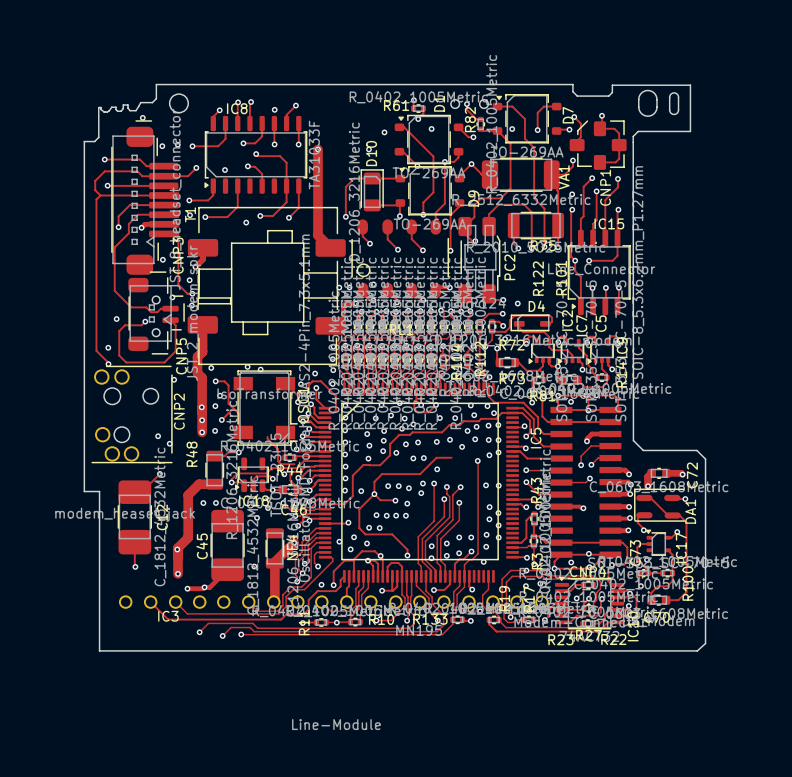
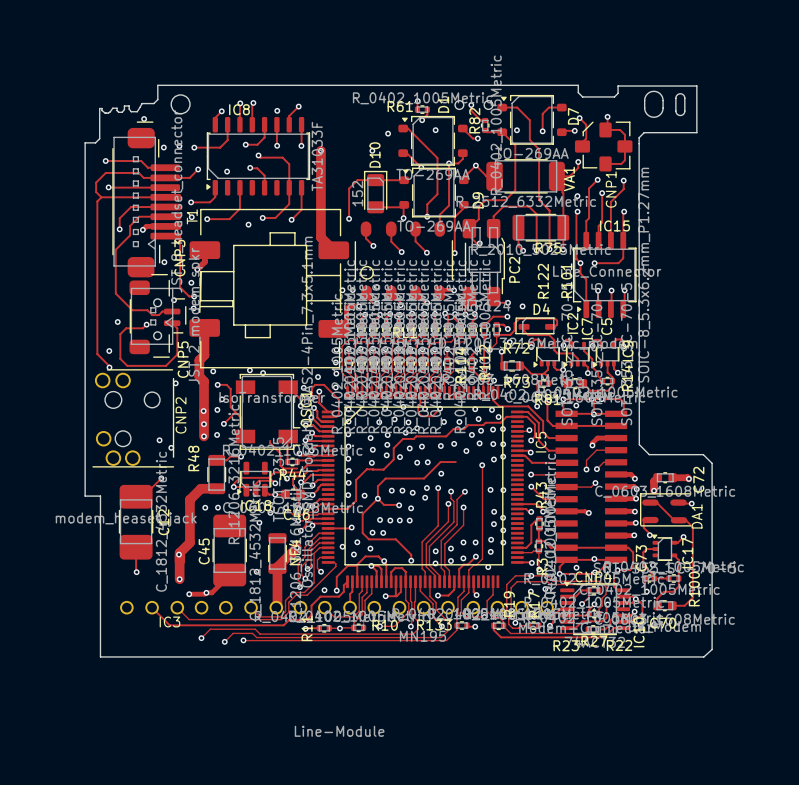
D10 value: D_1206_3216Metric (354, 191) -> 152 (357, 193)

